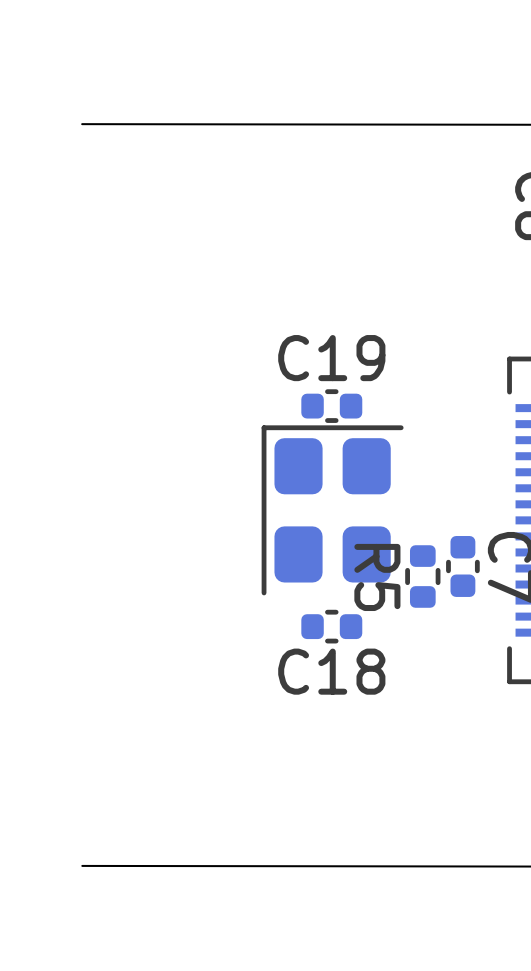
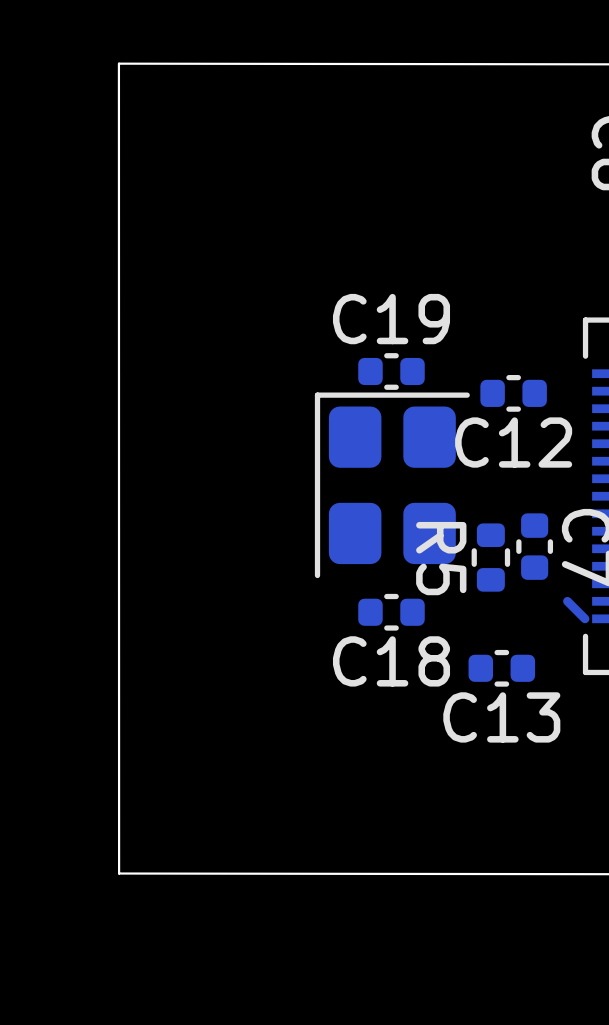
board edge: none -> (118, 63) (119, 873)
C12: none -> (513, 393)
track: none -> (567, 601) (585, 618)
C13: none -> (501, 668)

